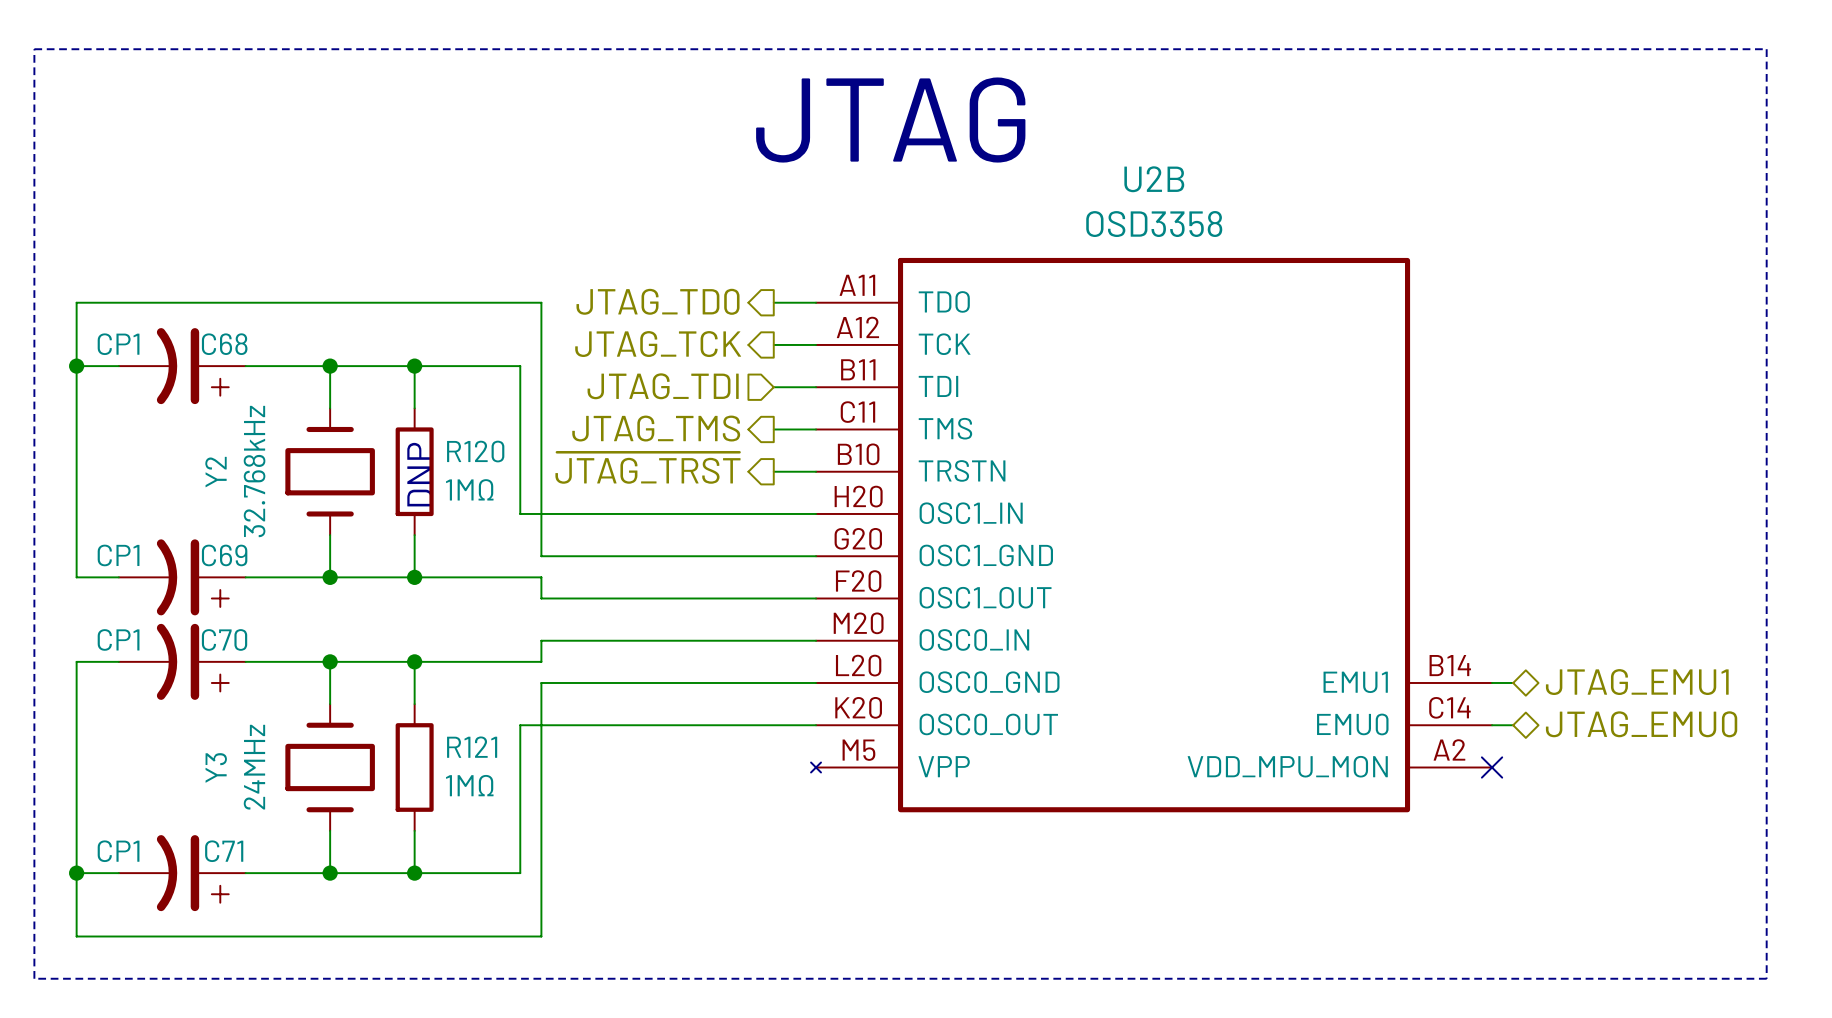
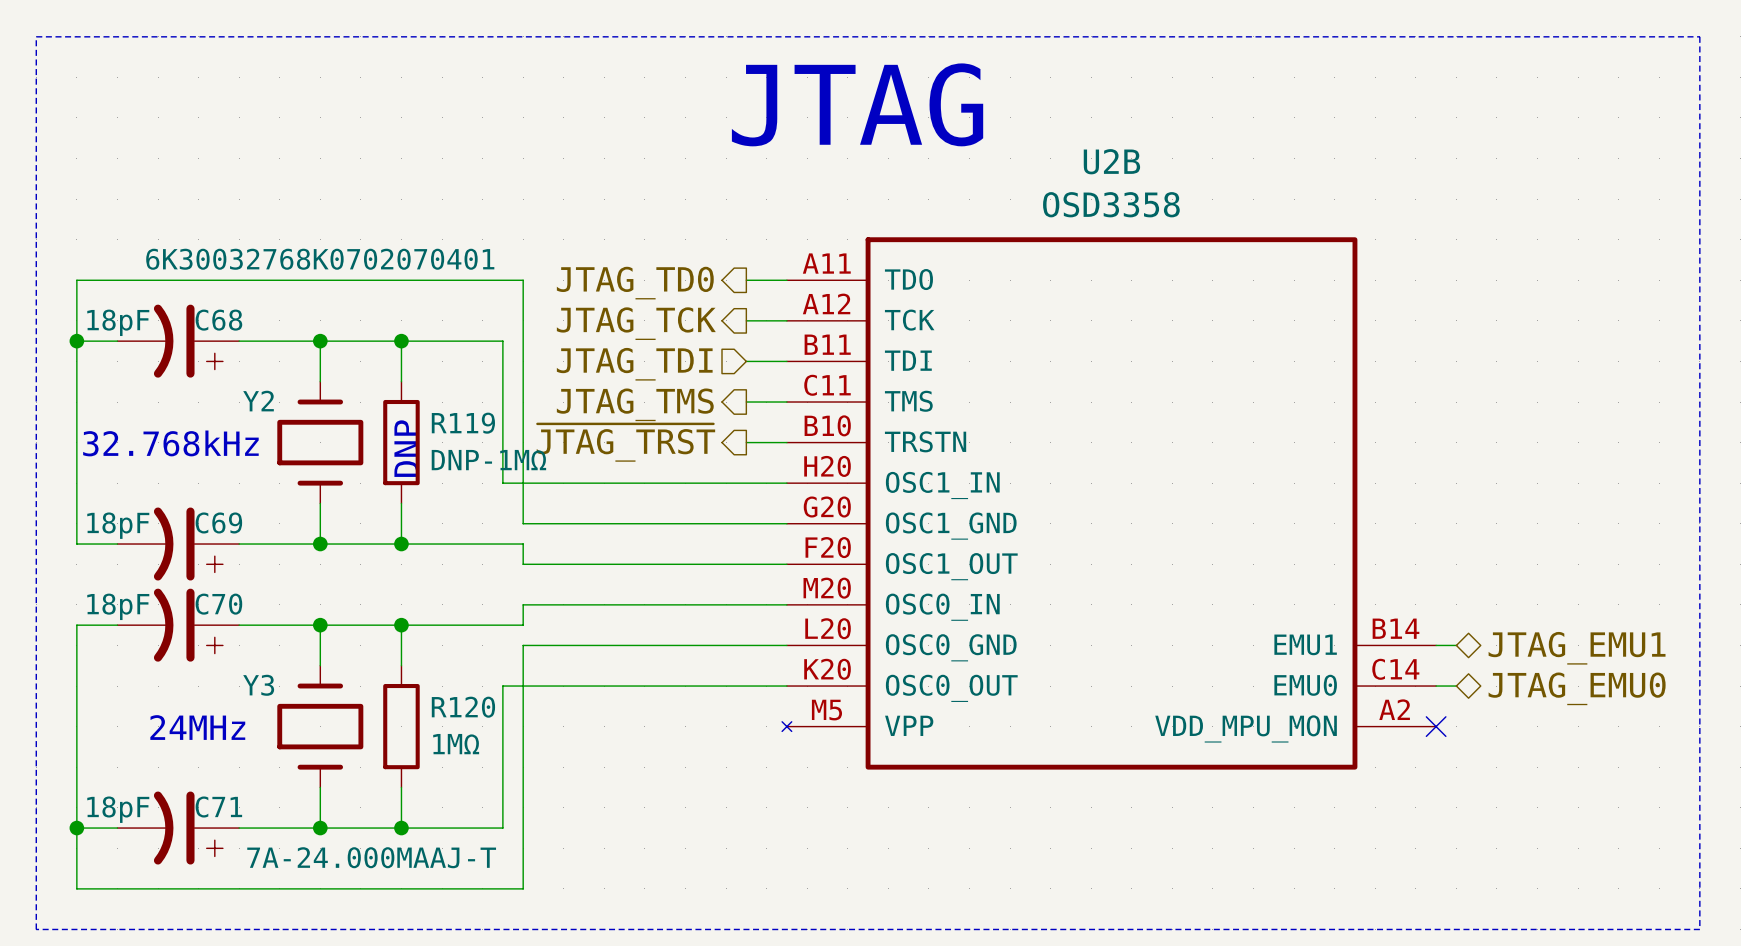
C68 value: CP1 (118, 344) -> 18pF (118, 322)
R120 name: R120 (475, 451) -> R119 (463, 423)
Y2 value: 32.768kHz (254, 471) -> 6K30032768K0702070401 (320, 259)
text: none -> 32.768kHz (170, 443)
Y2 name rotation: 0° (216, 472) -> 90° clockwise (258, 401)
Y2 name position: Y2 (216, 472) -> Y2 (258, 401)
R120 value: 1MΩ (469, 489) -> DNP-1MΩ (488, 460)
C69 value: CP1 (118, 555) -> 18pF (118, 525)
C70 value: CP1 (118, 639) -> 18pF (118, 606)
R121 name: R121 (472, 747) -> R120 (463, 707)
Y3 name rotation: 0° (216, 767) -> 90° clockwise (258, 685)
Y3 name position: Y3 (216, 767) -> Y3 (258, 685)
Y3 value: 24MHz (254, 767) -> 7A-24.000MAAJ-T (371, 857)
text: none -> 24MHz (197, 727)
C71 value: CP1 (118, 851) -> 18pF (118, 809)

